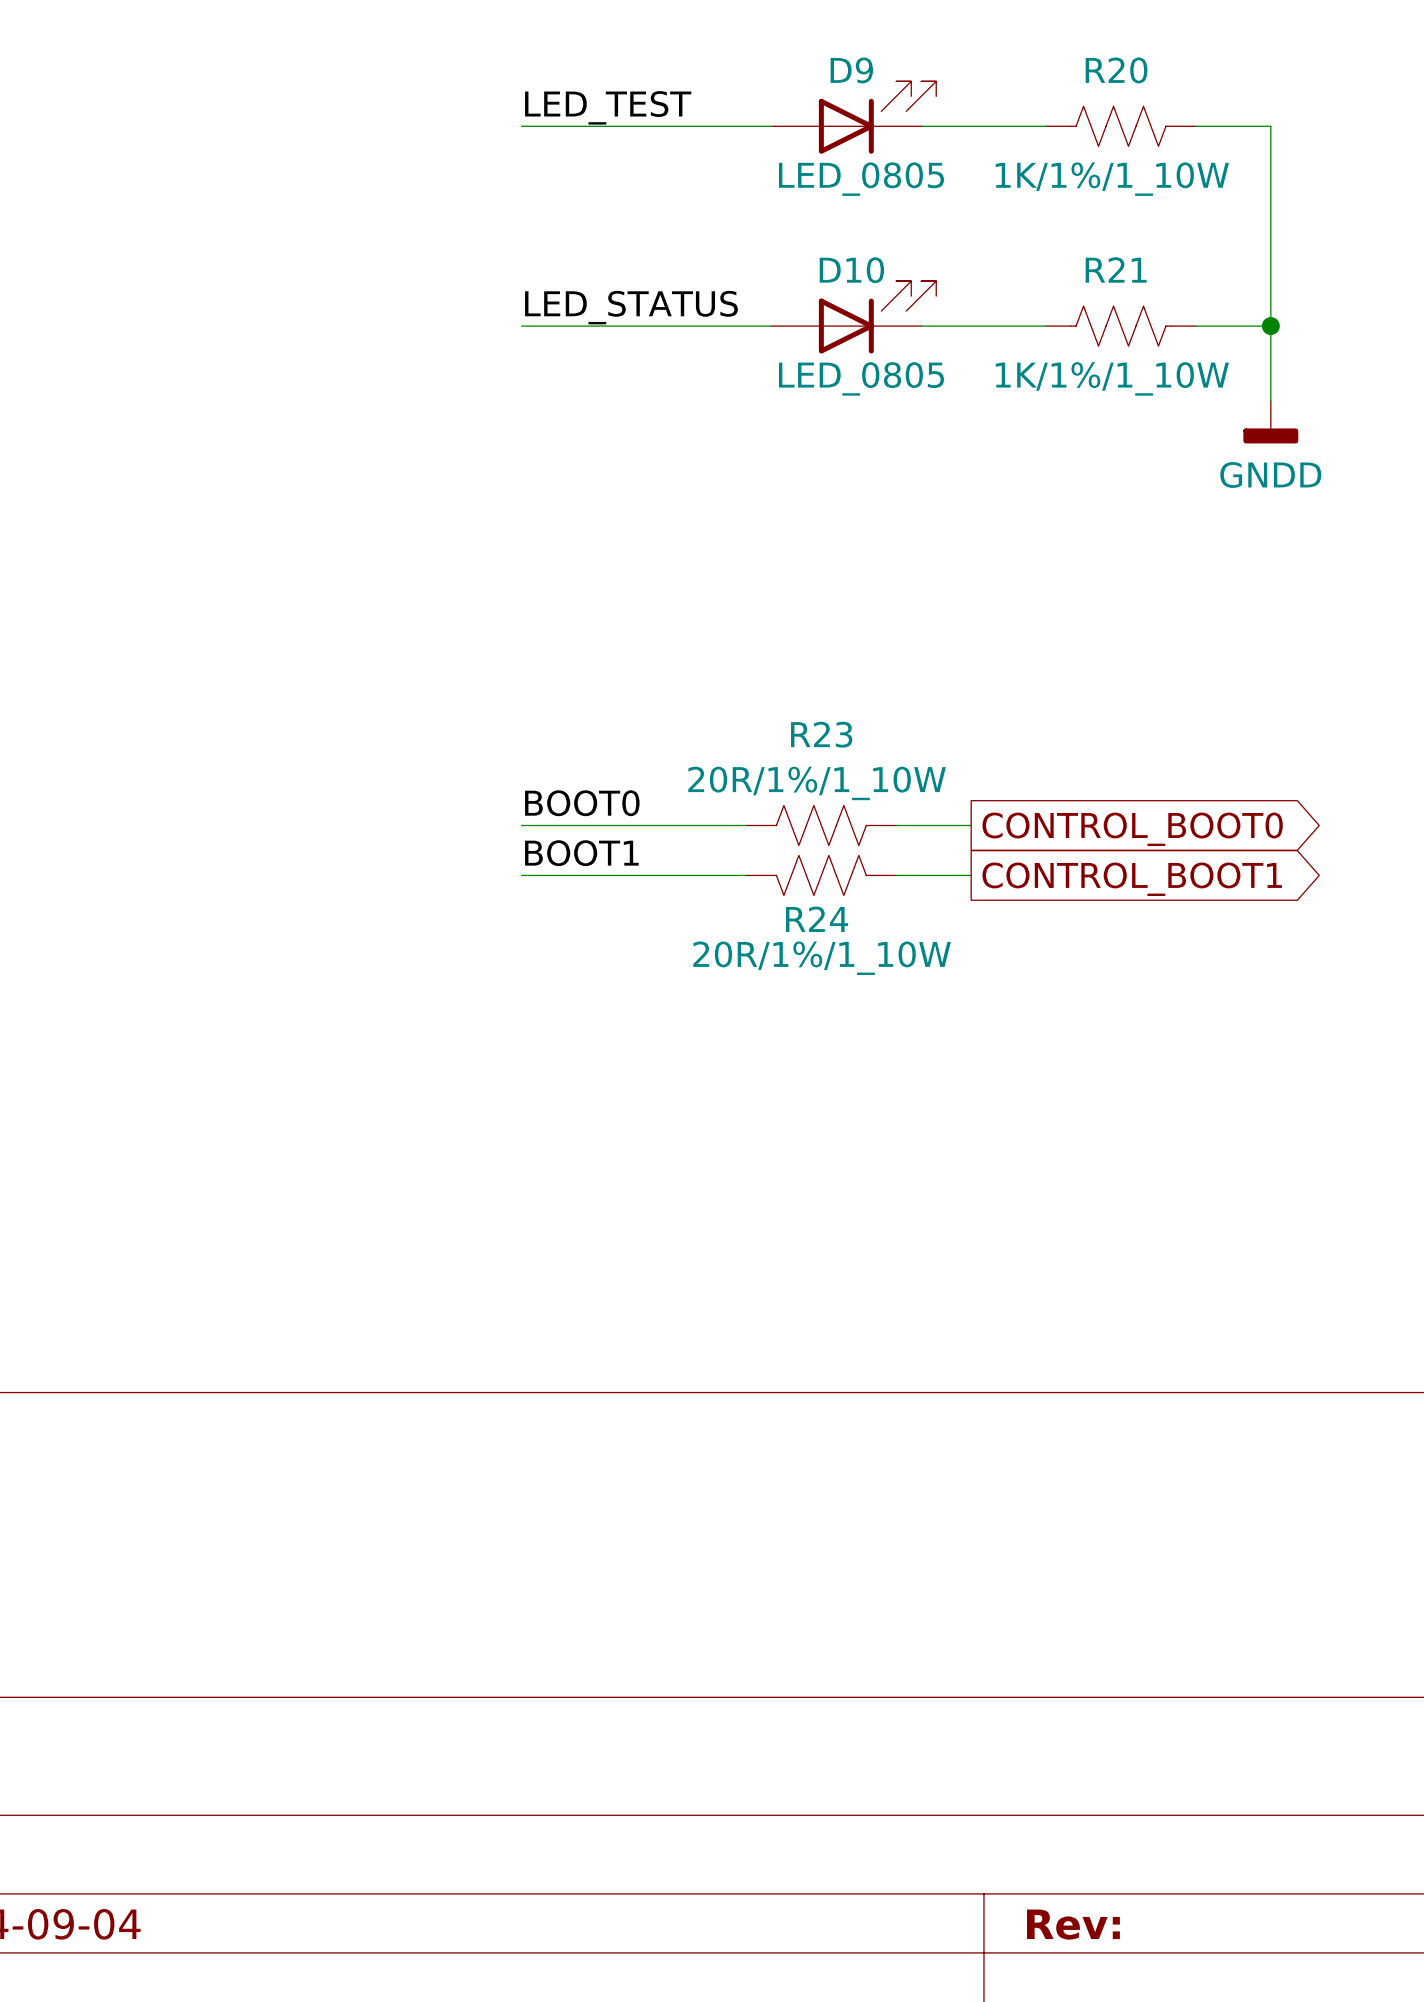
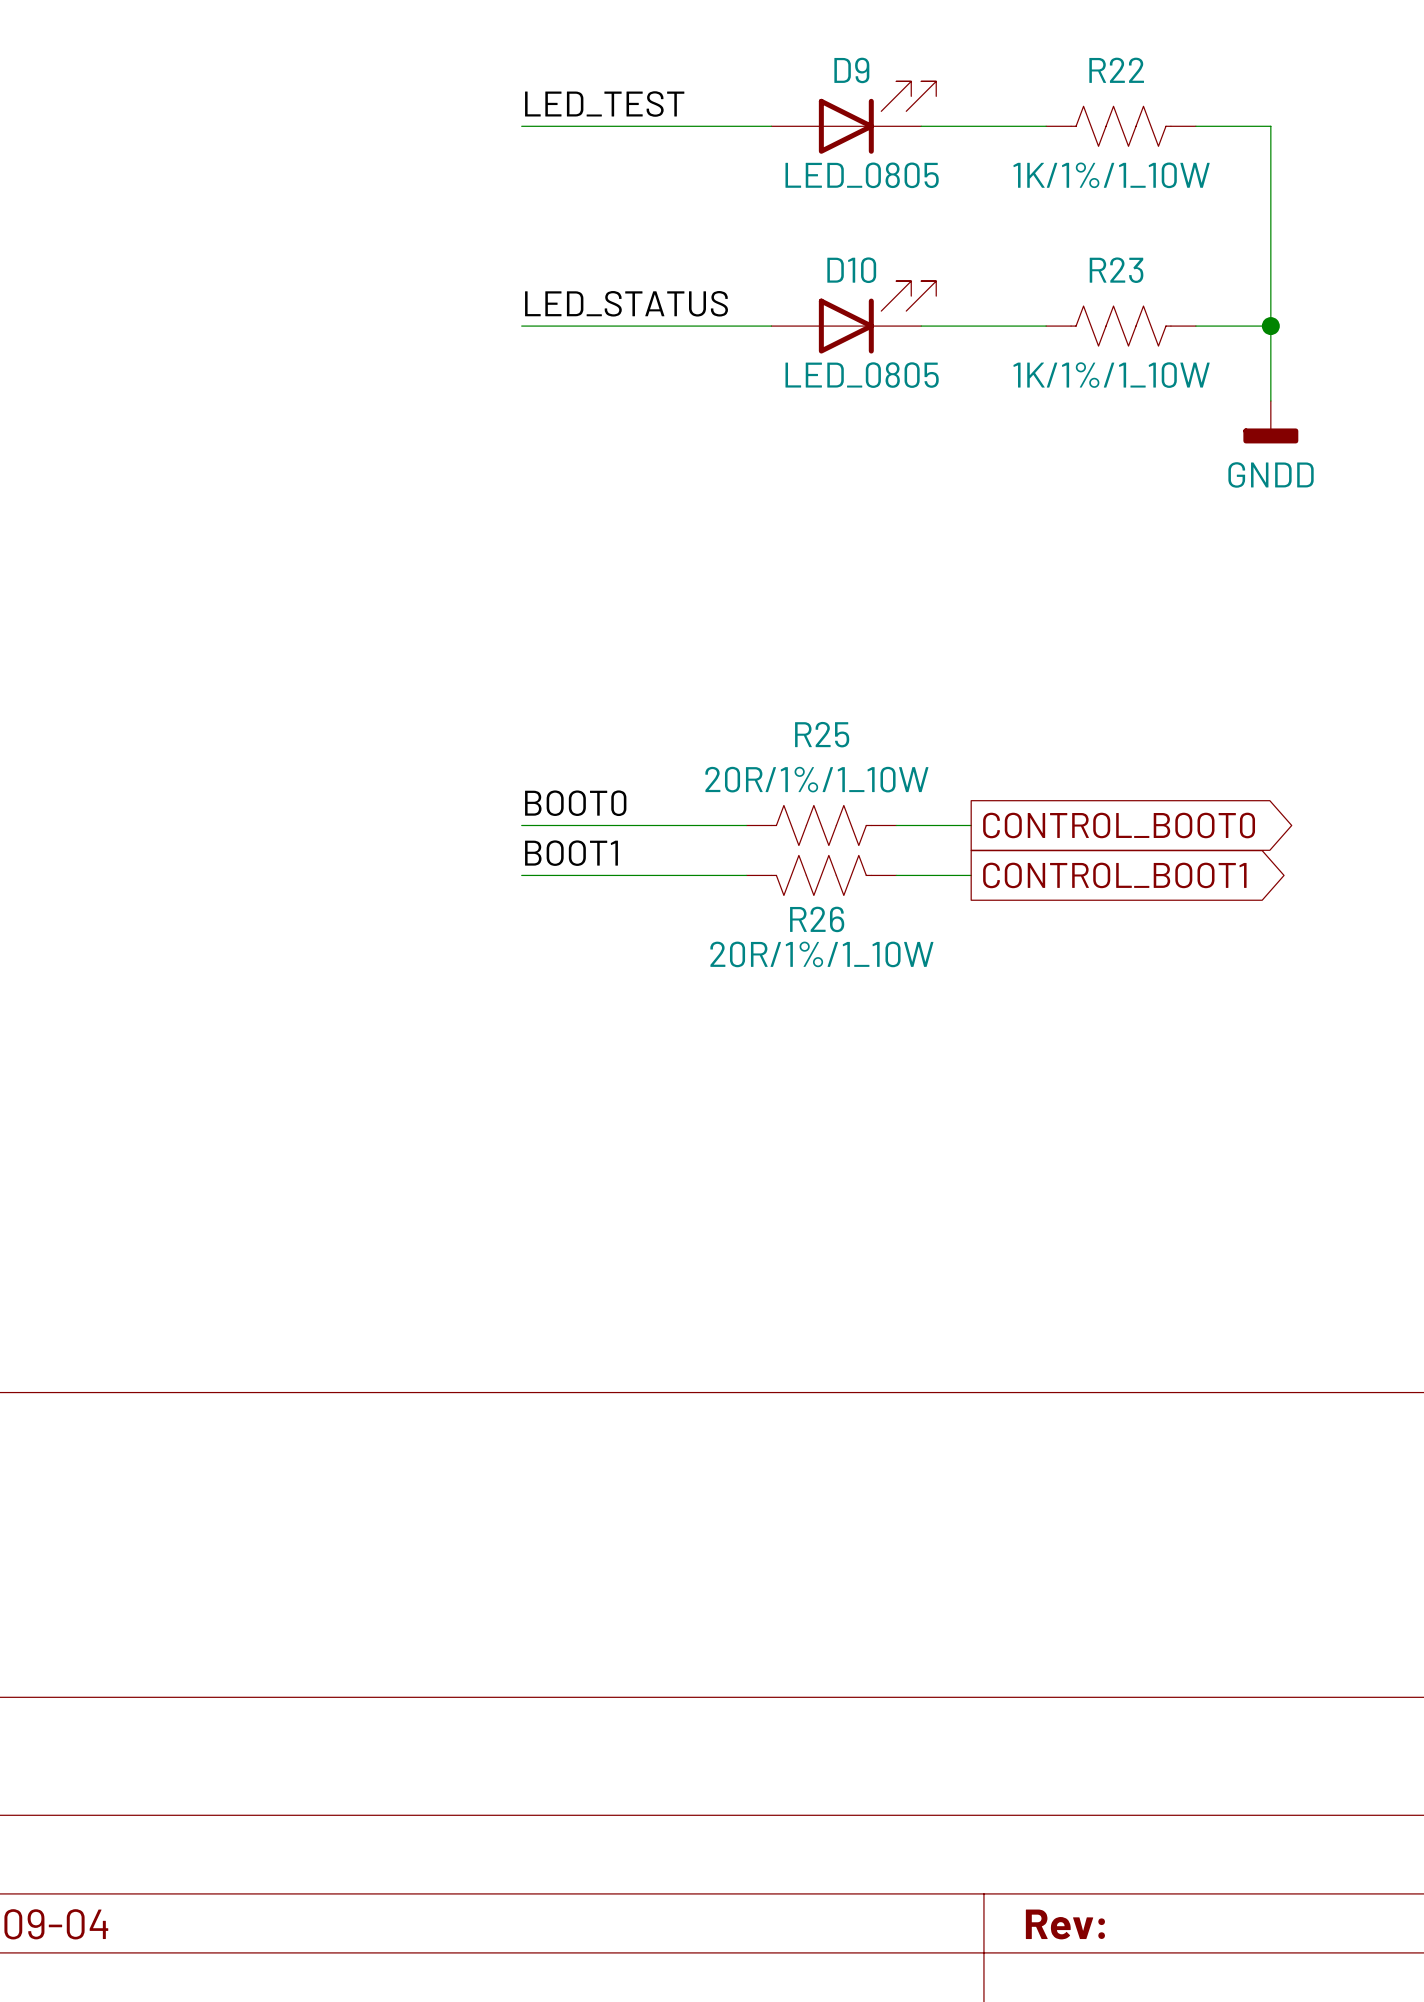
R20 name: R20 (1116, 70) -> R22 (1116, 70)
R21 name: R21 (1116, 269) -> R23 (1116, 270)
R23 name: R23 (821, 734) -> R25 (822, 734)
R24 name: R24 (817, 919) -> R26 (817, 919)

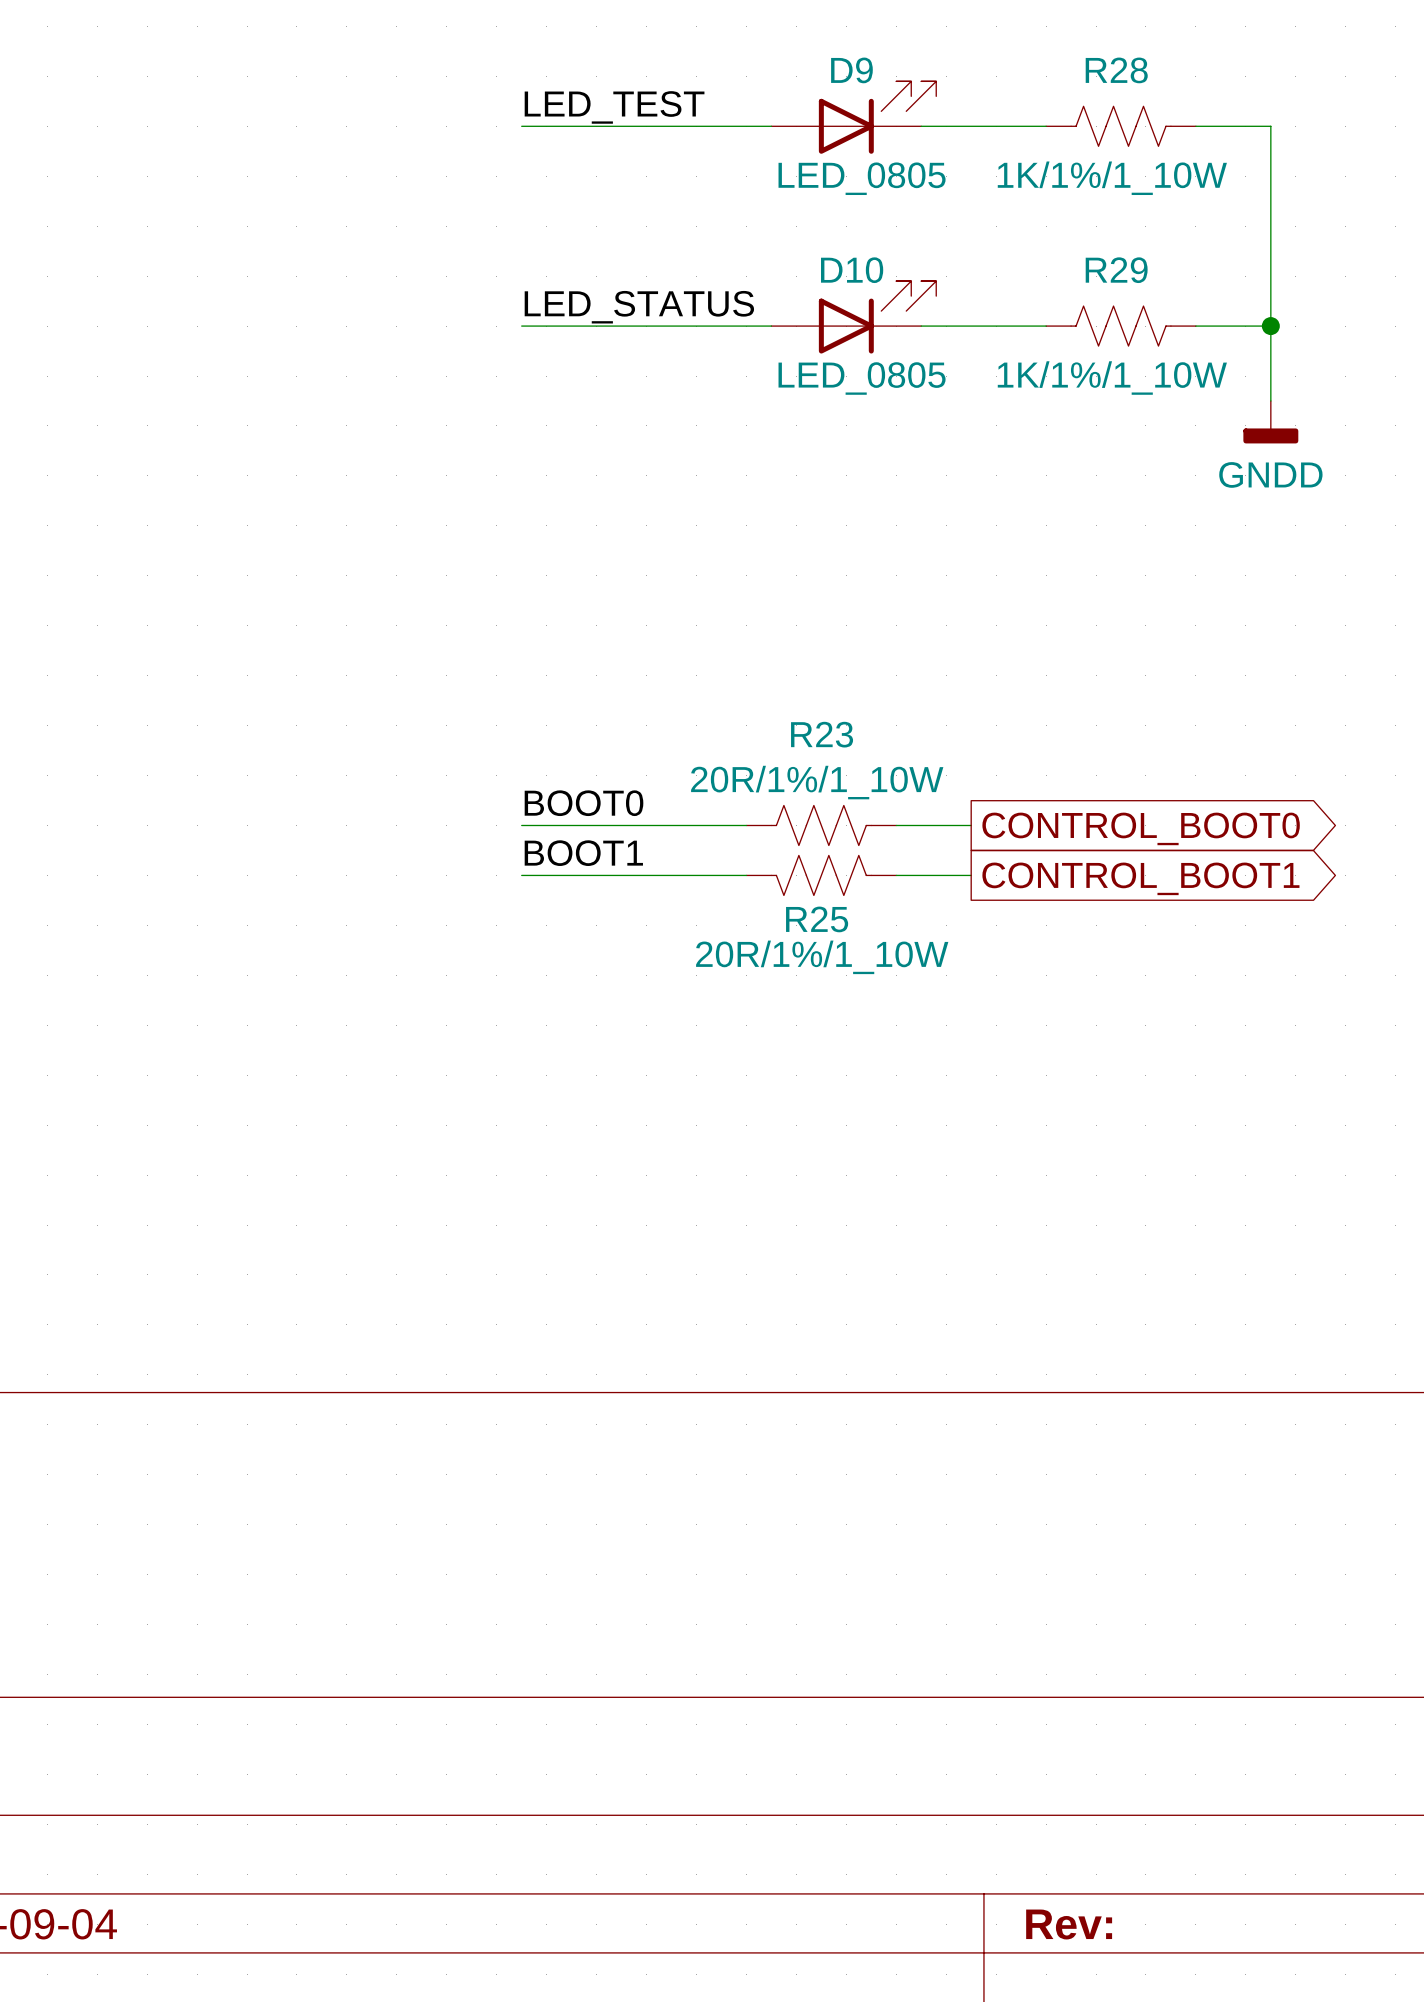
R22 name: R22 (1116, 70) -> R28 (1116, 70)
R23 name: R23 (1116, 270) -> R29 (1116, 270)
R25 name: R25 (822, 734) -> R23 (822, 734)
R26 name: R26 (817, 919) -> R25 (817, 919)

